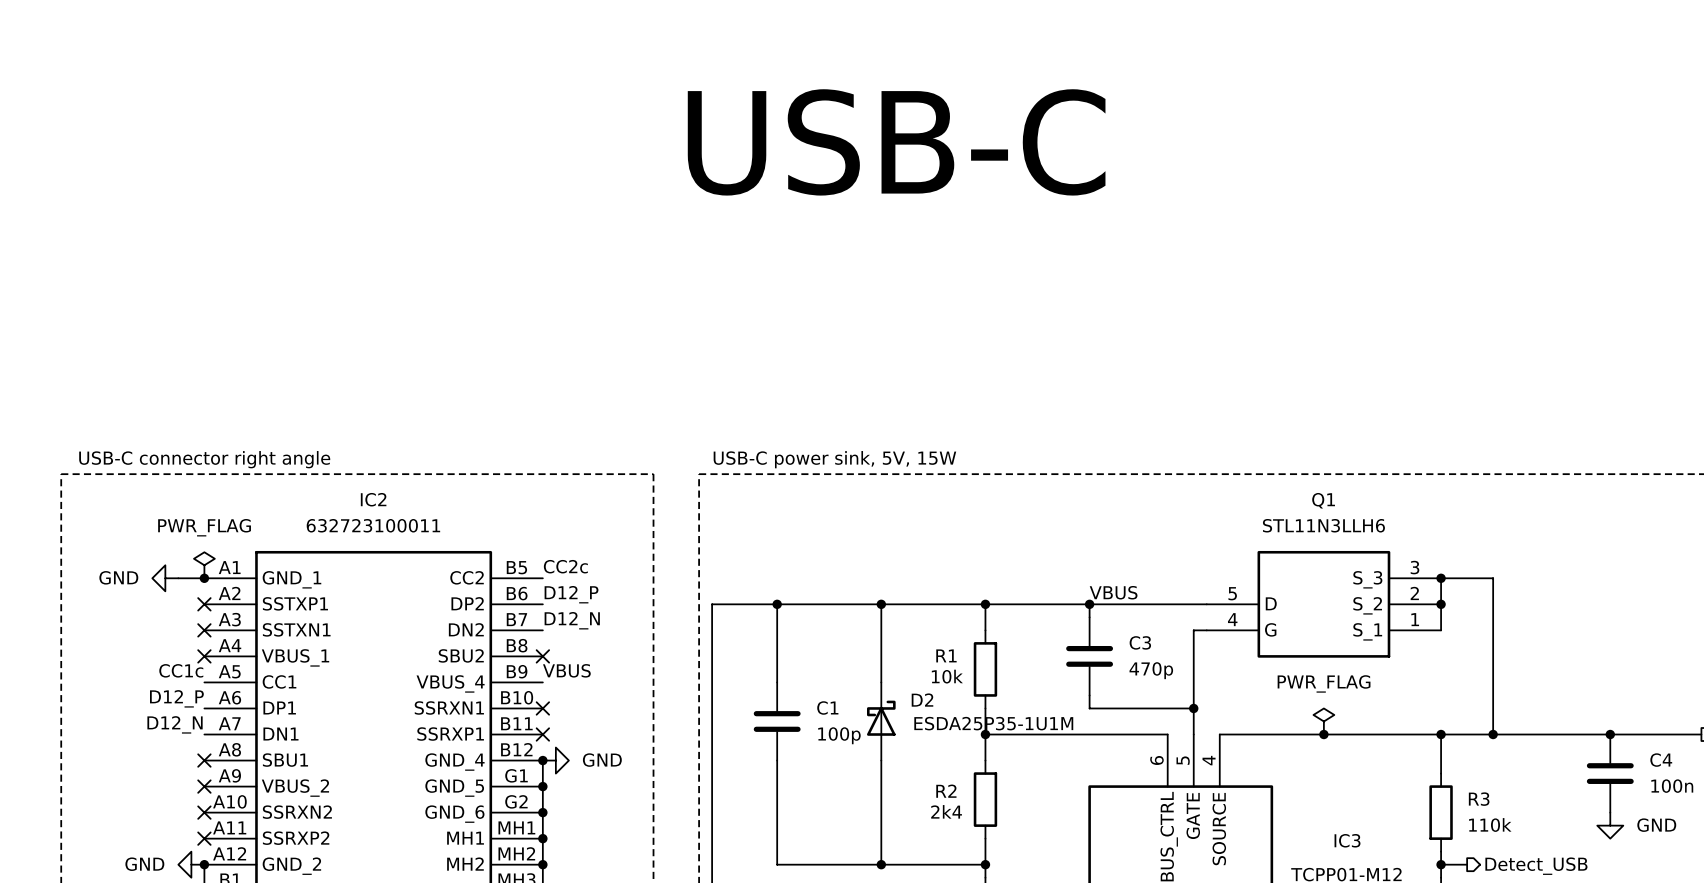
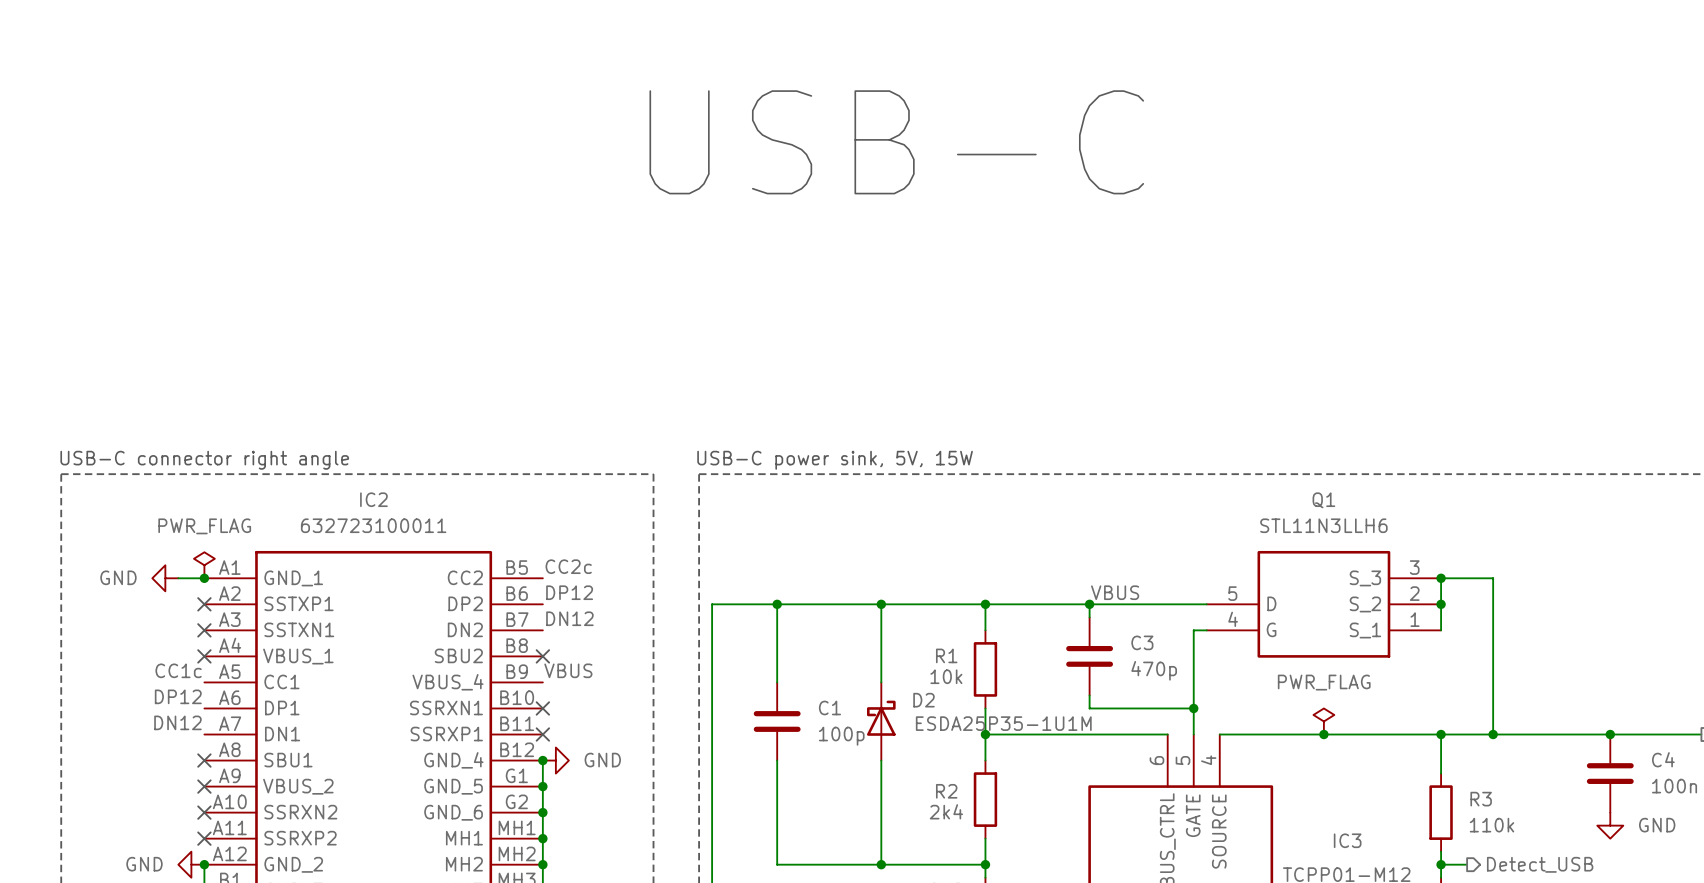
label: D12_P (571, 594) -> DP12 (569, 592)
label: D12_N (572, 620) -> DN12 (569, 618)
label: D12_P (176, 698) -> DP12 (178, 696)
label: D12_N (175, 724) -> DN12 (177, 722)

